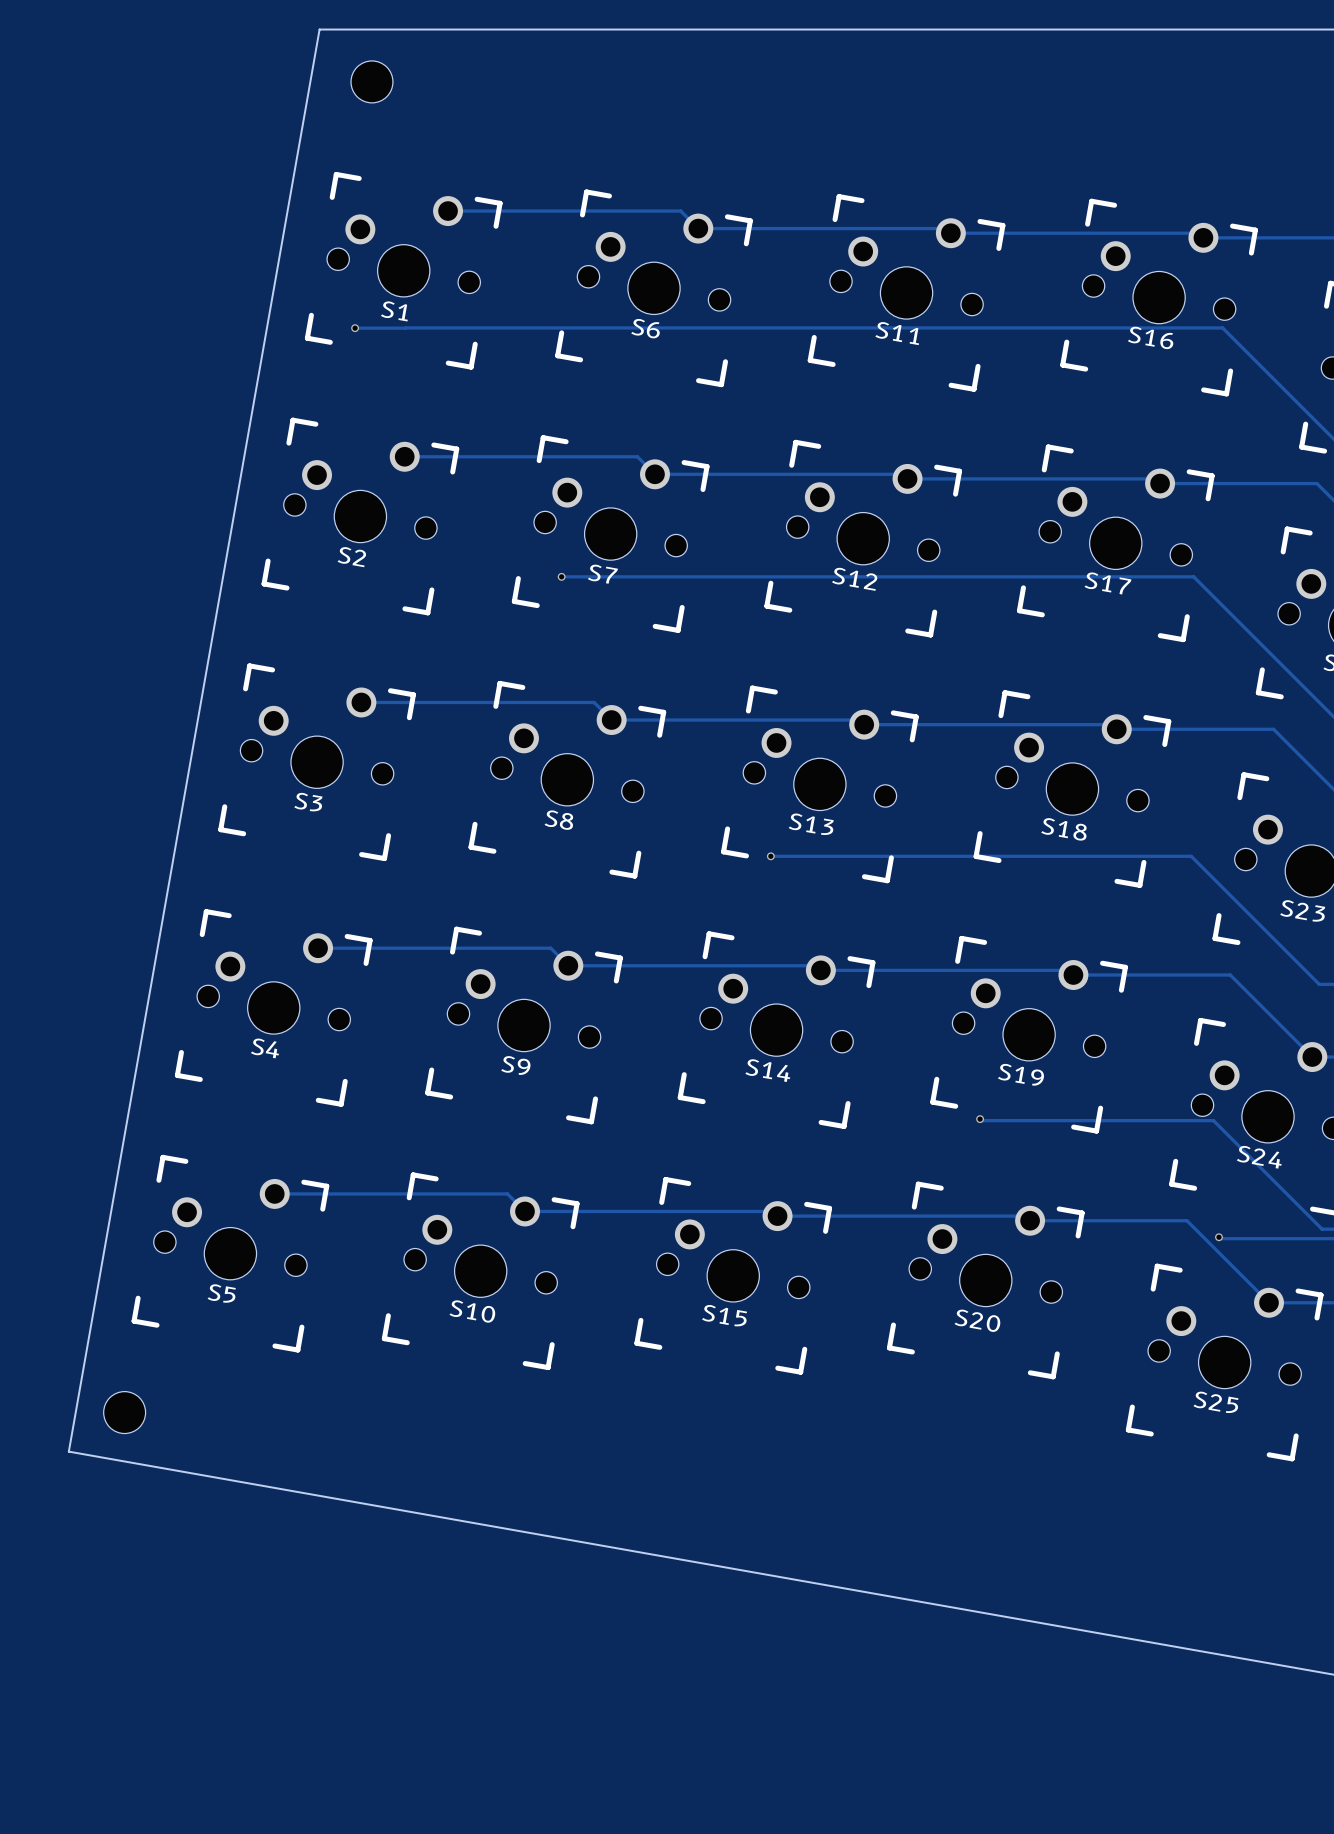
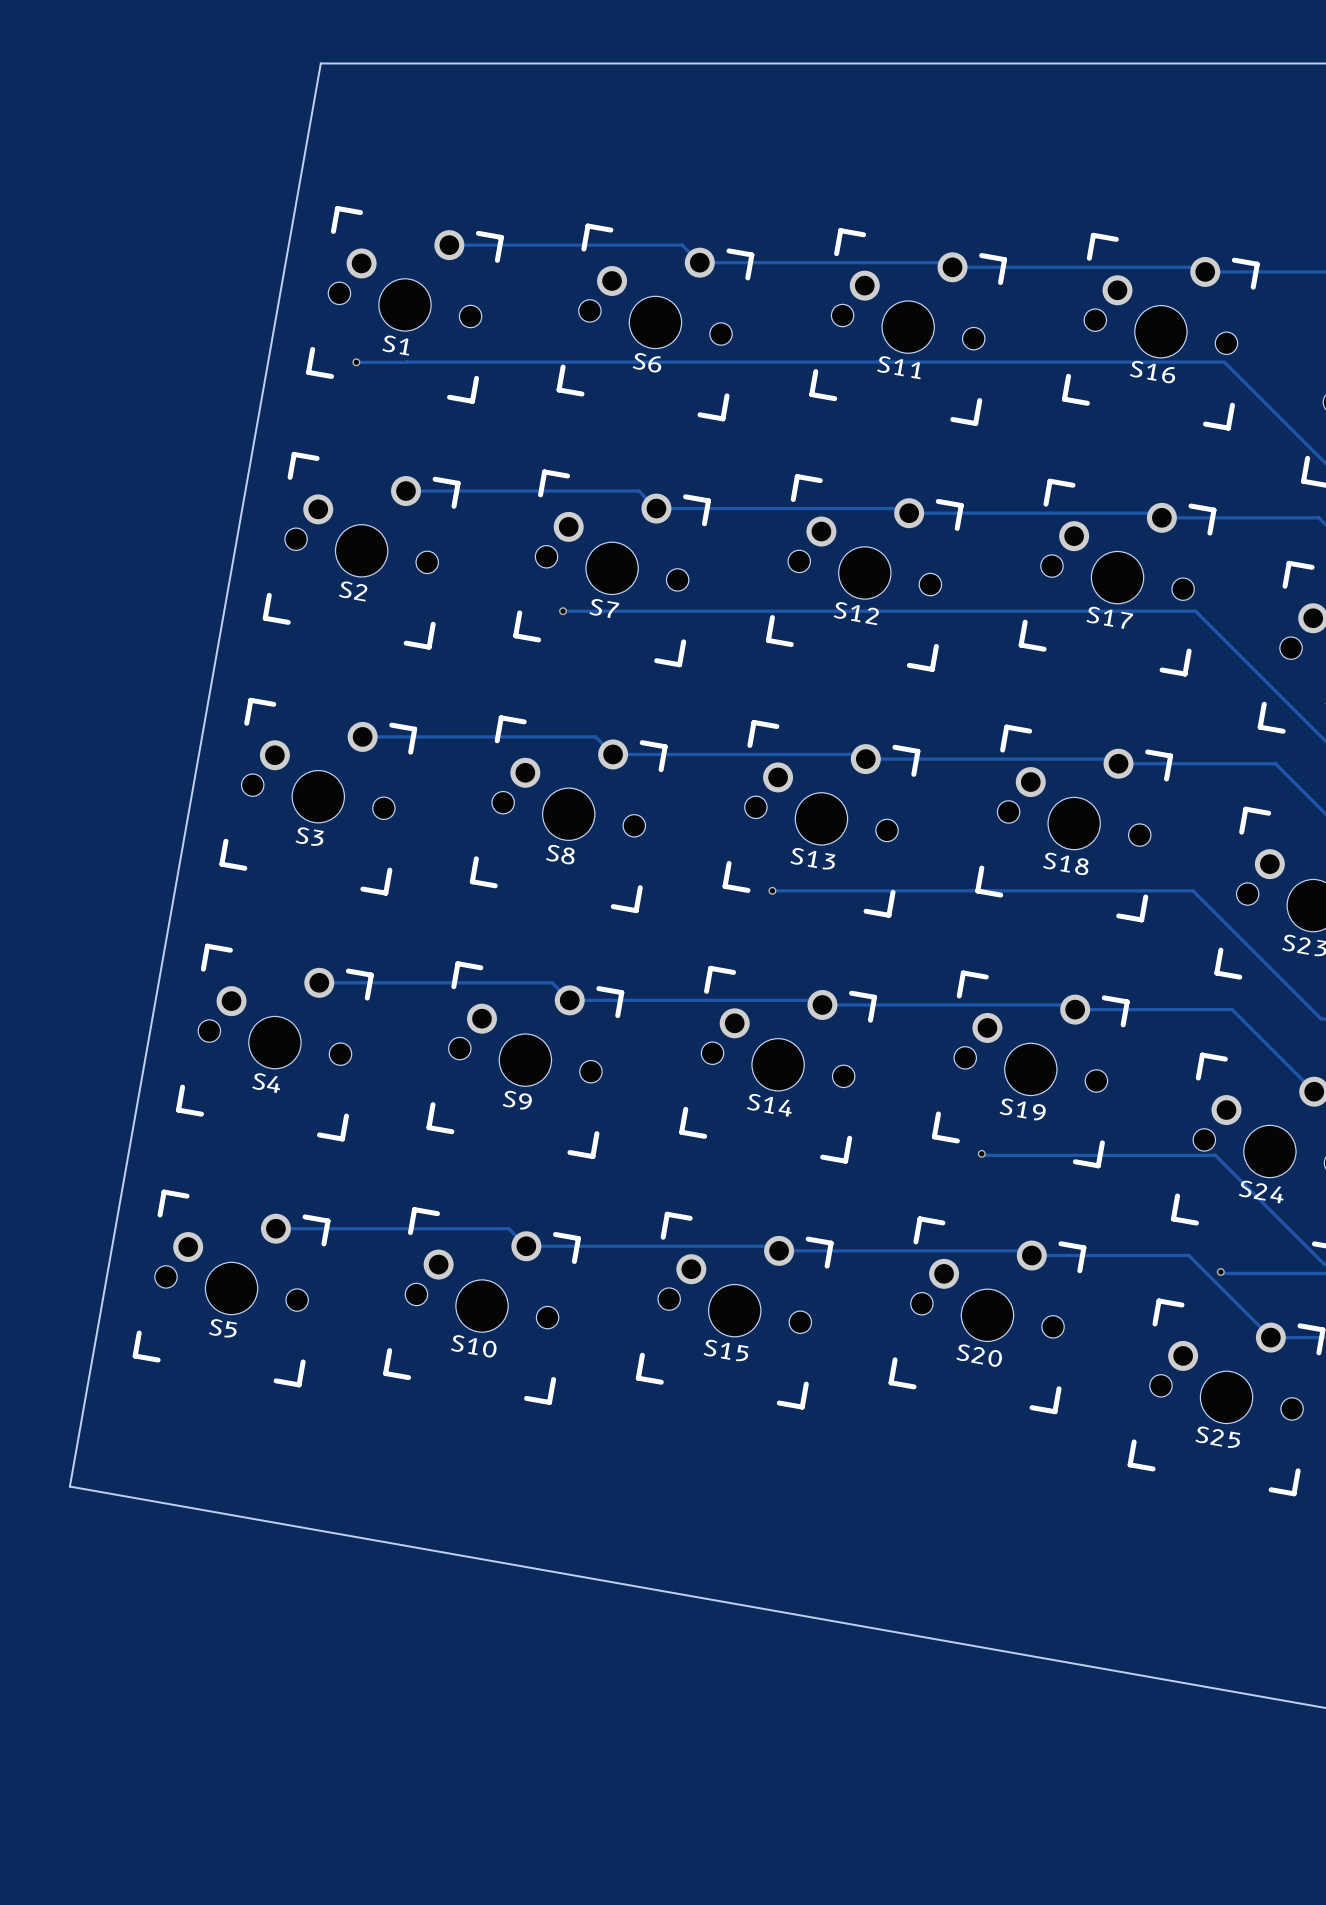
part: (371, 81) -> none
part: (124, 1412) -> none

